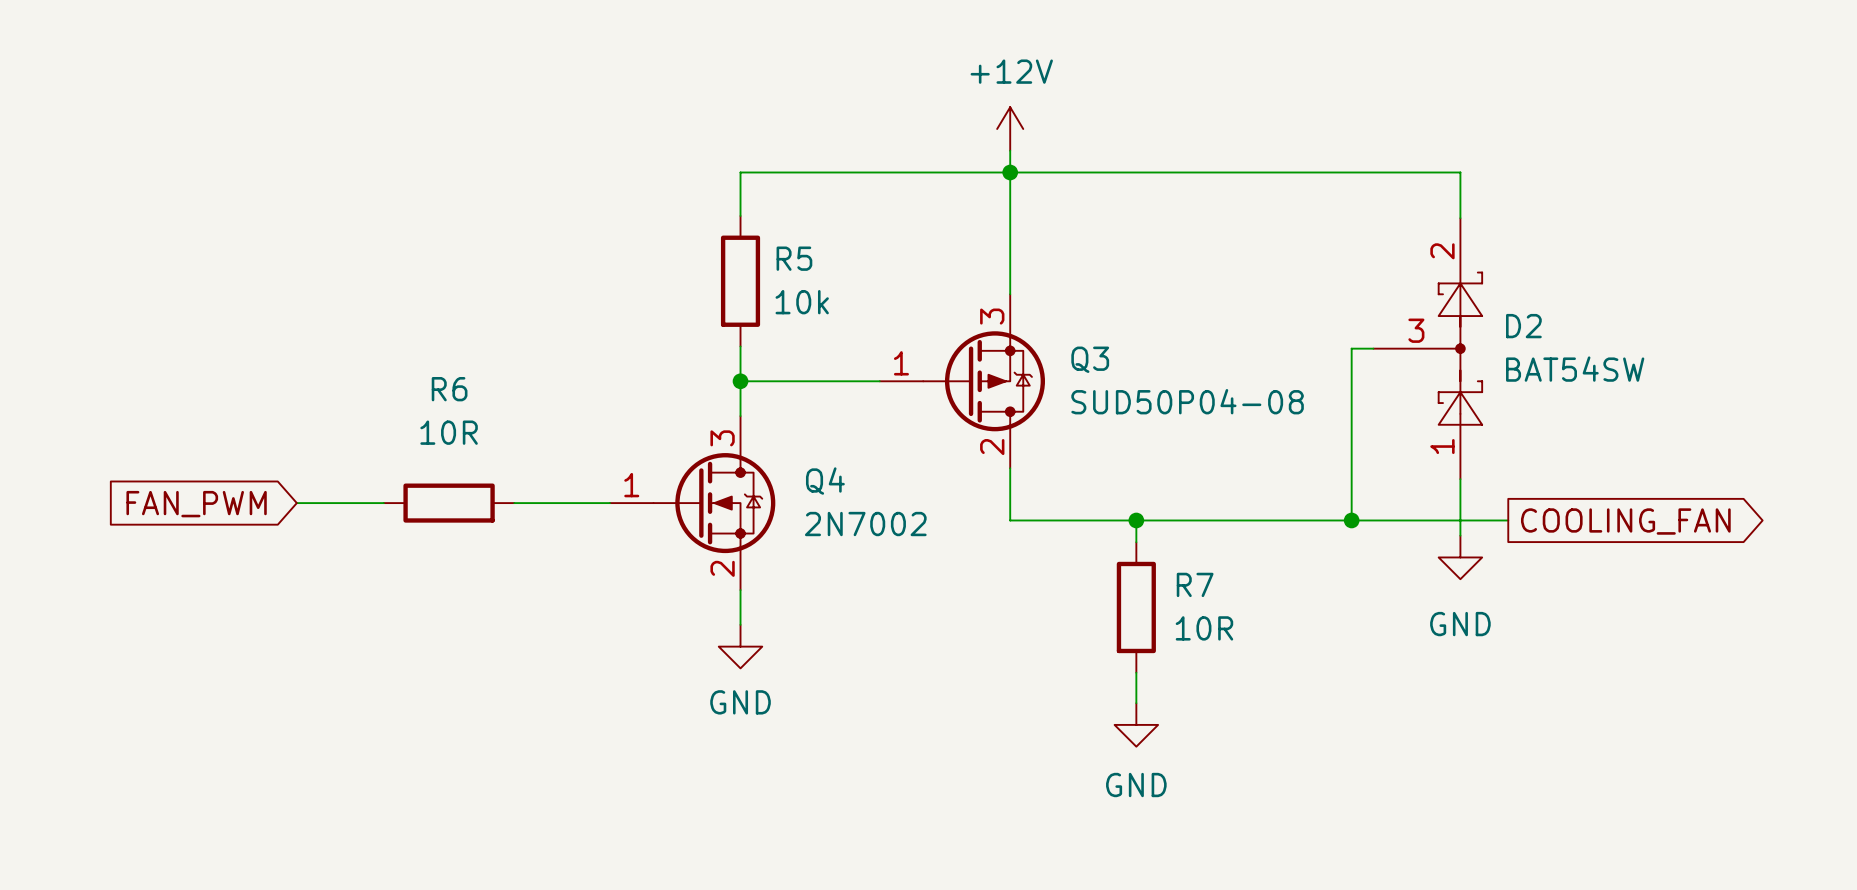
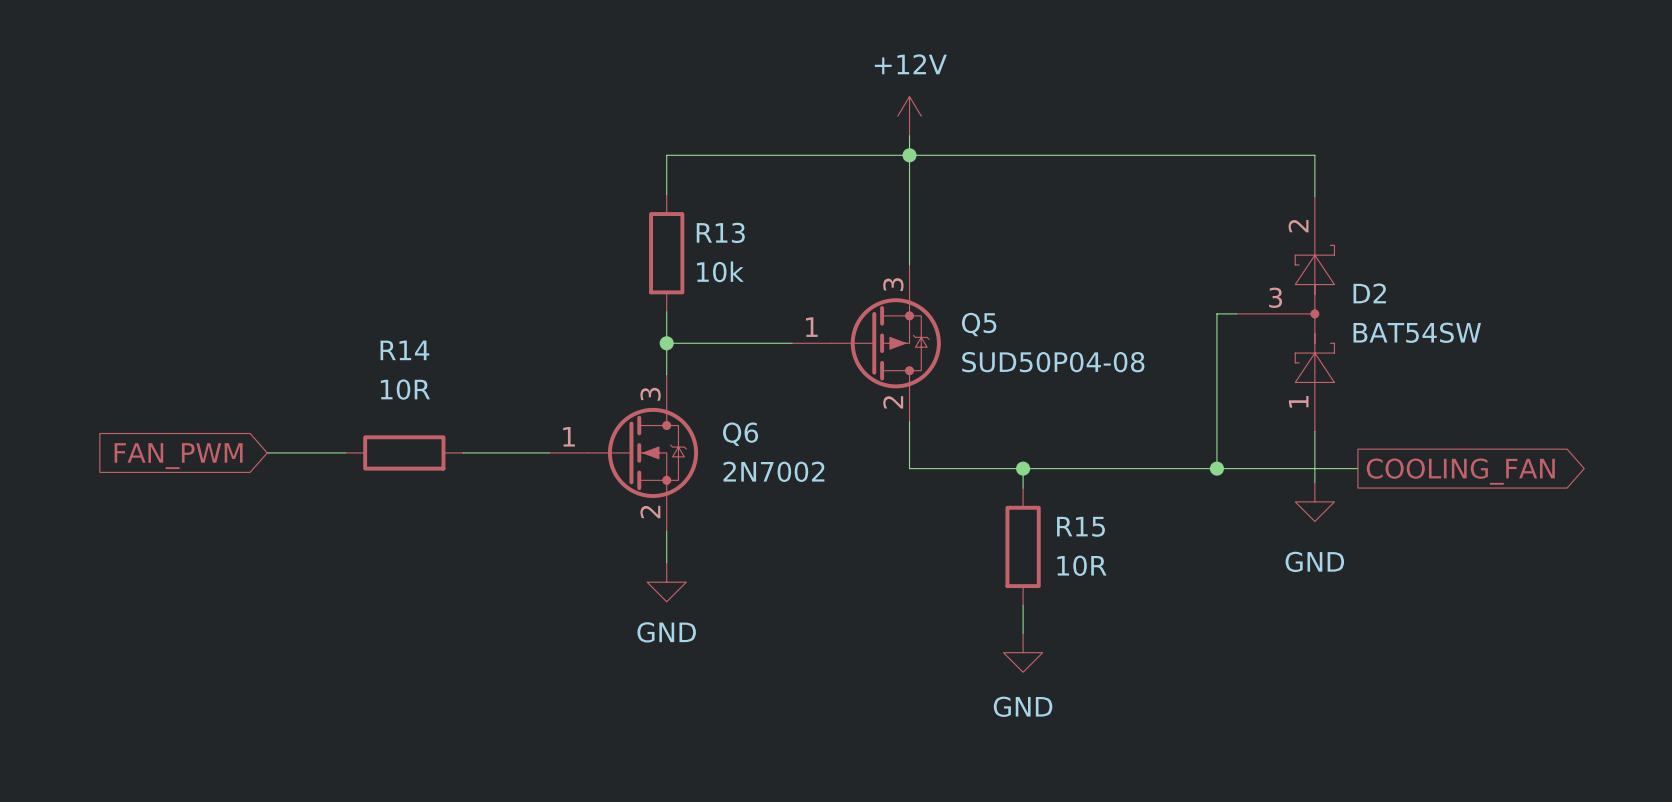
R5 name: R5 (794, 258) -> R13 (720, 232)
Q3 name: Q3 (1090, 359) -> Q5 (979, 324)
R6 name: R6 (449, 389) -> R14 (404, 350)
Q4 name: Q4 (825, 481) -> Q6 (740, 434)
R7 name: R7 (1195, 584) -> R15 (1080, 526)

